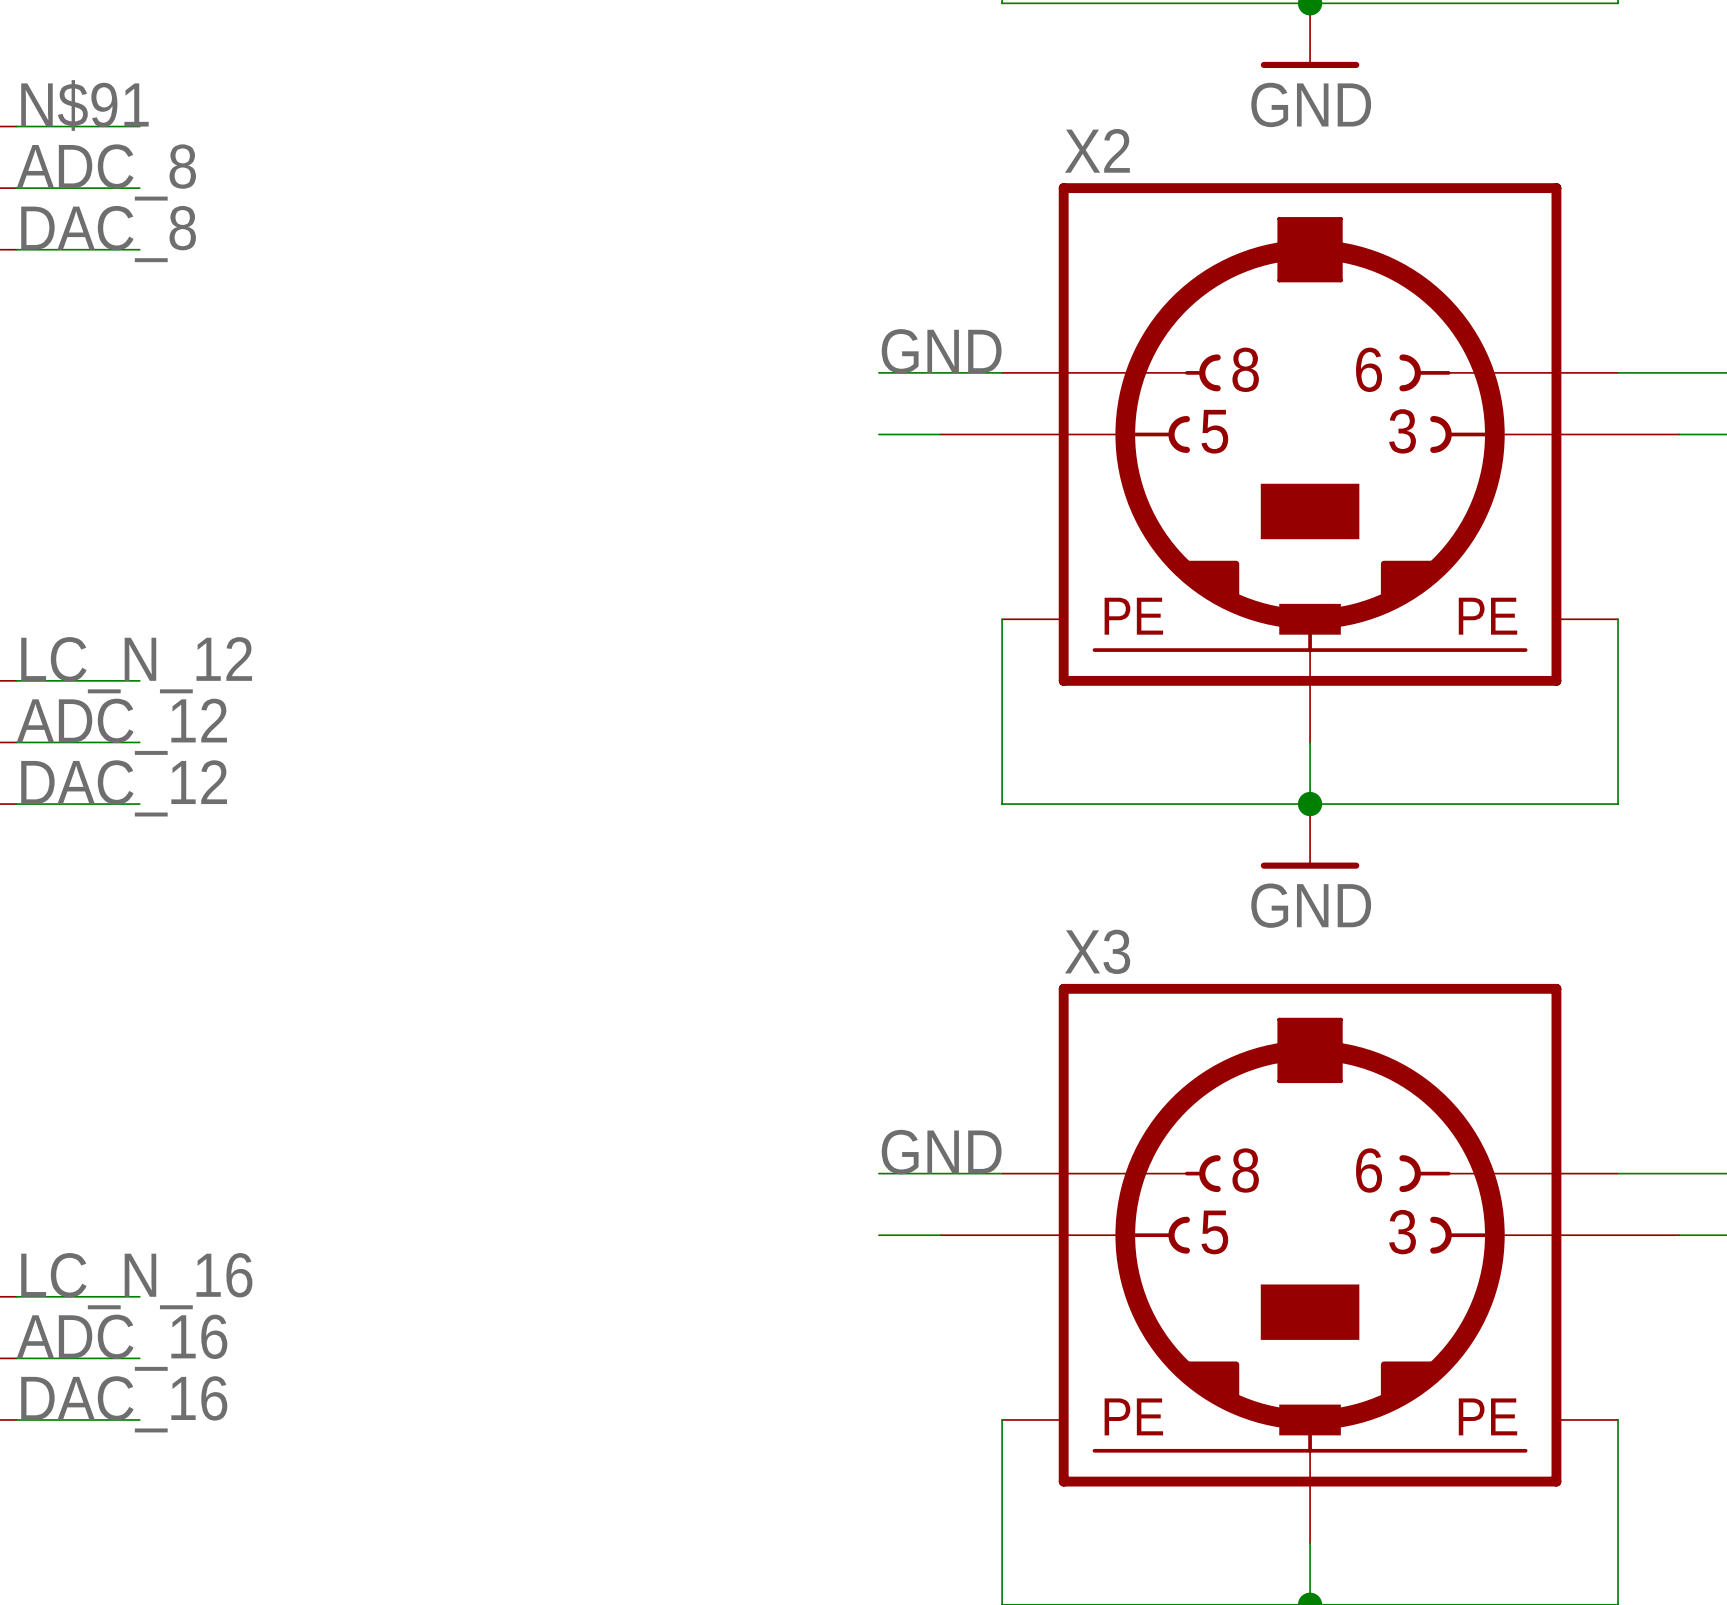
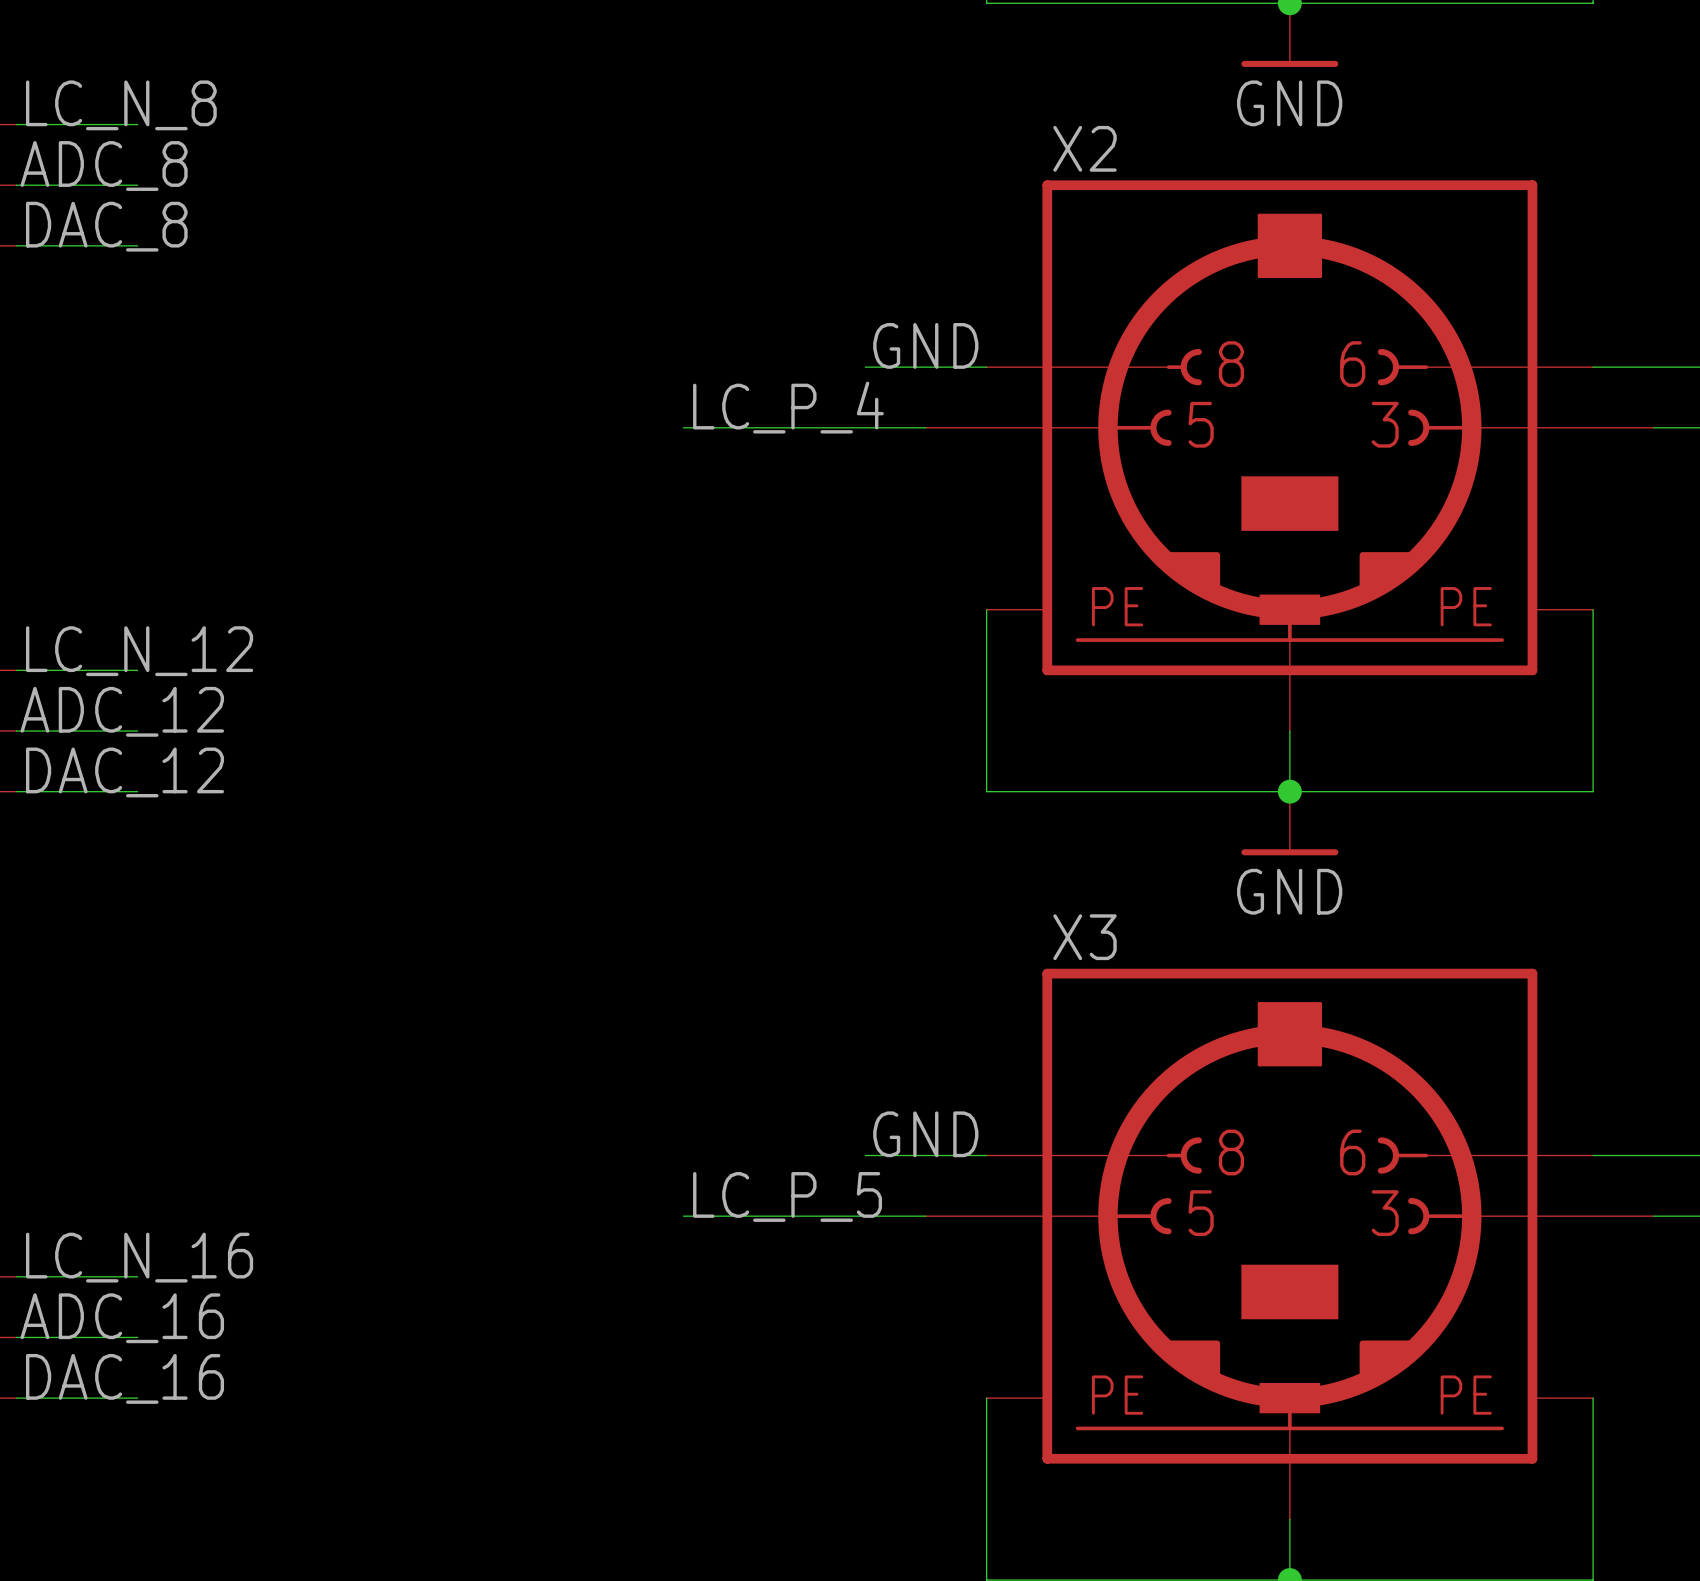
label: N$91 (84, 105) -> LC_N_8 (121, 105)
label: none -> LC_P_4 (788, 407)
wire: none -> (683, 427) (865, 427)
label: none -> LC_P_5 (787, 1196)
wire: none -> (683, 1216) (865, 1216)

